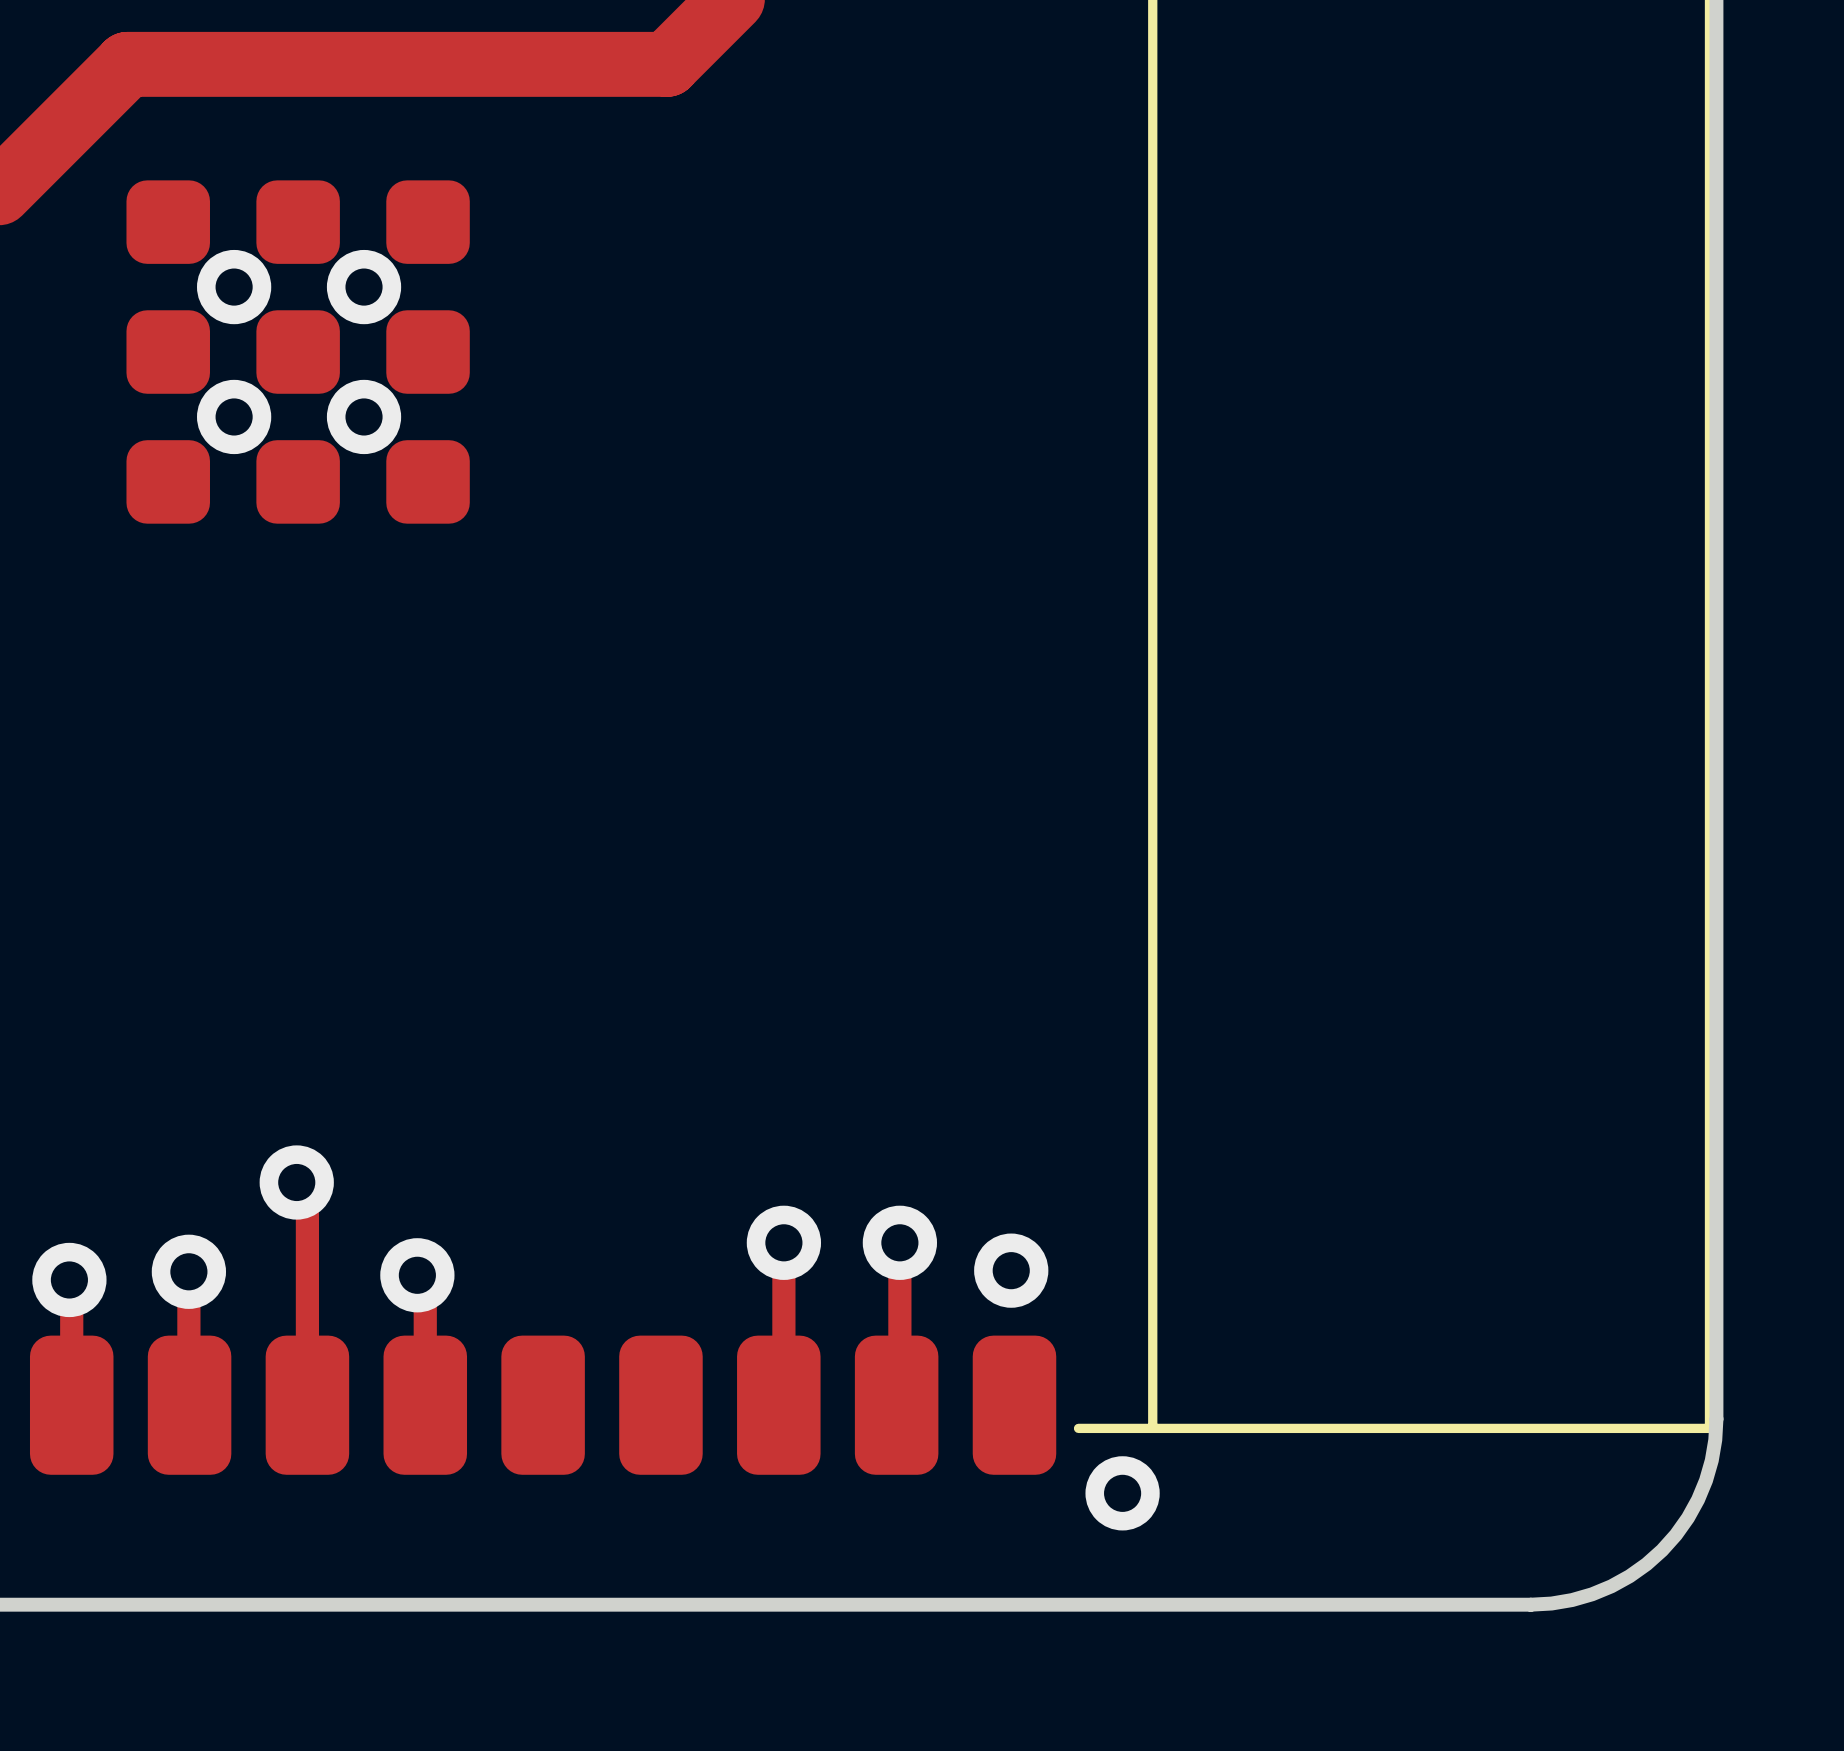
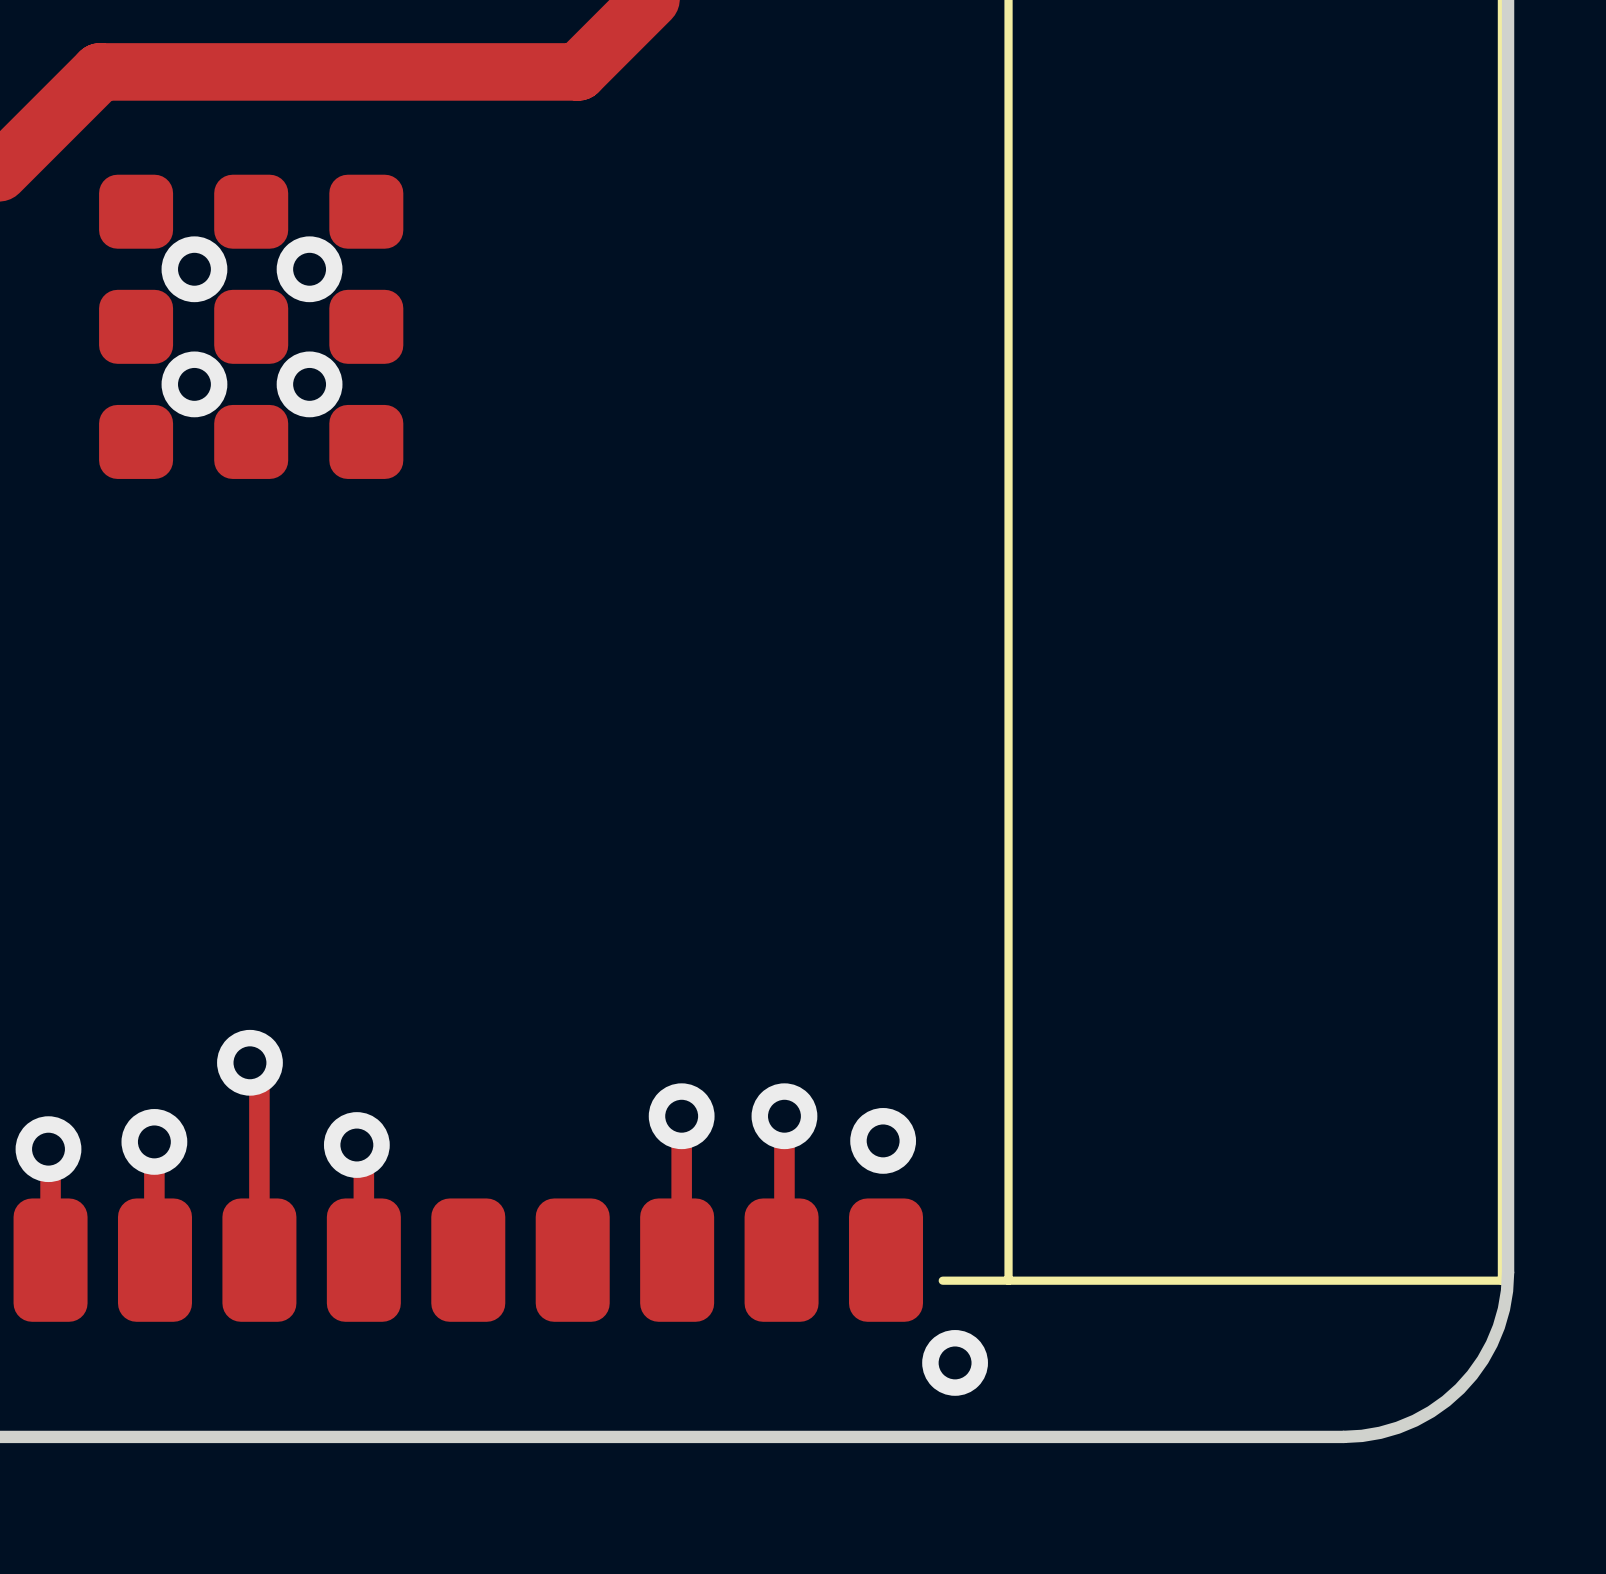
via position: (1122, 1493) -> (955, 1362)

